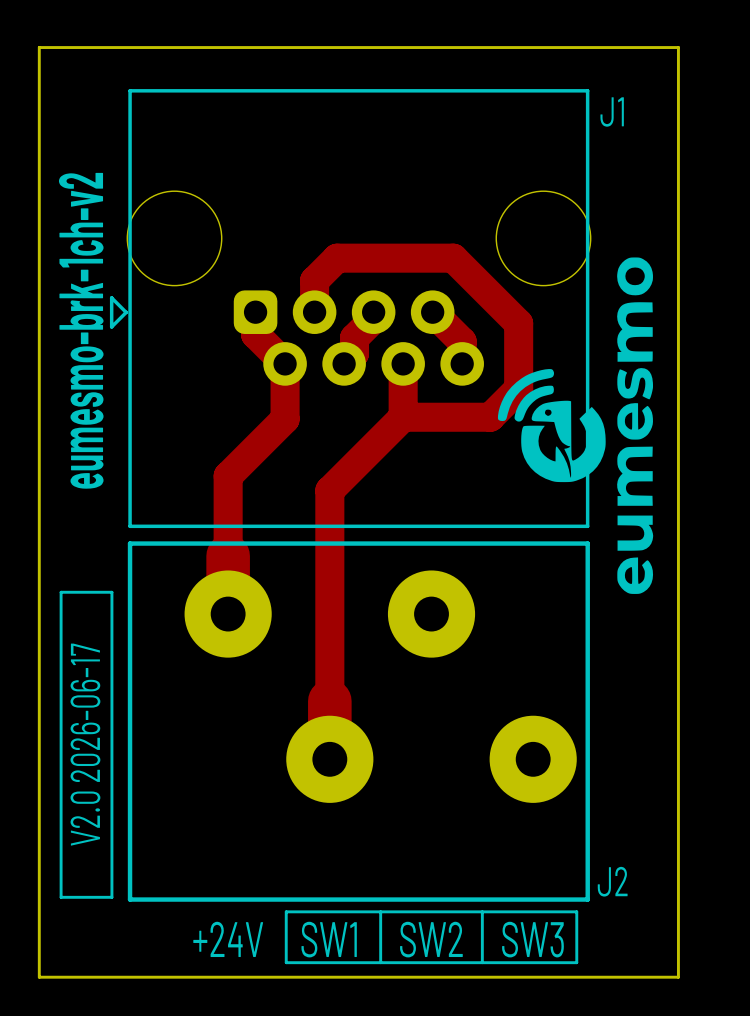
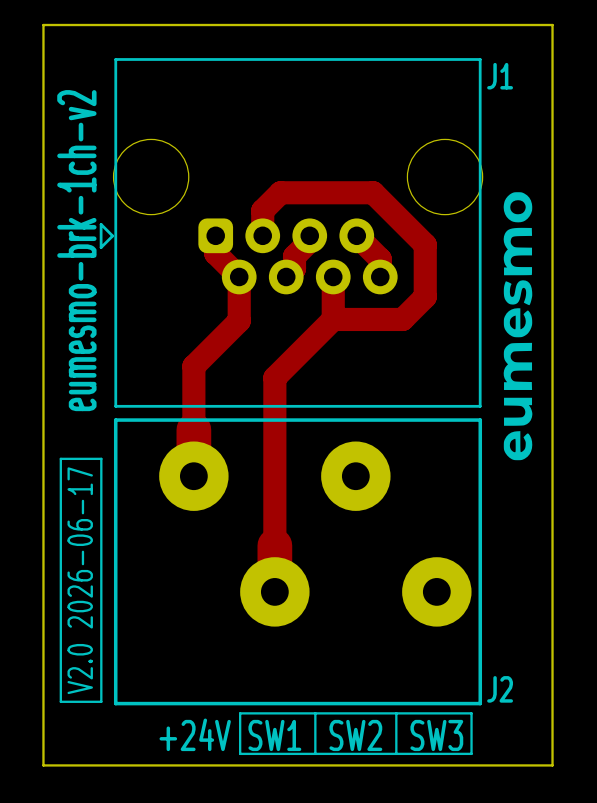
drawing: [497, 257, 654, 594] -> none

